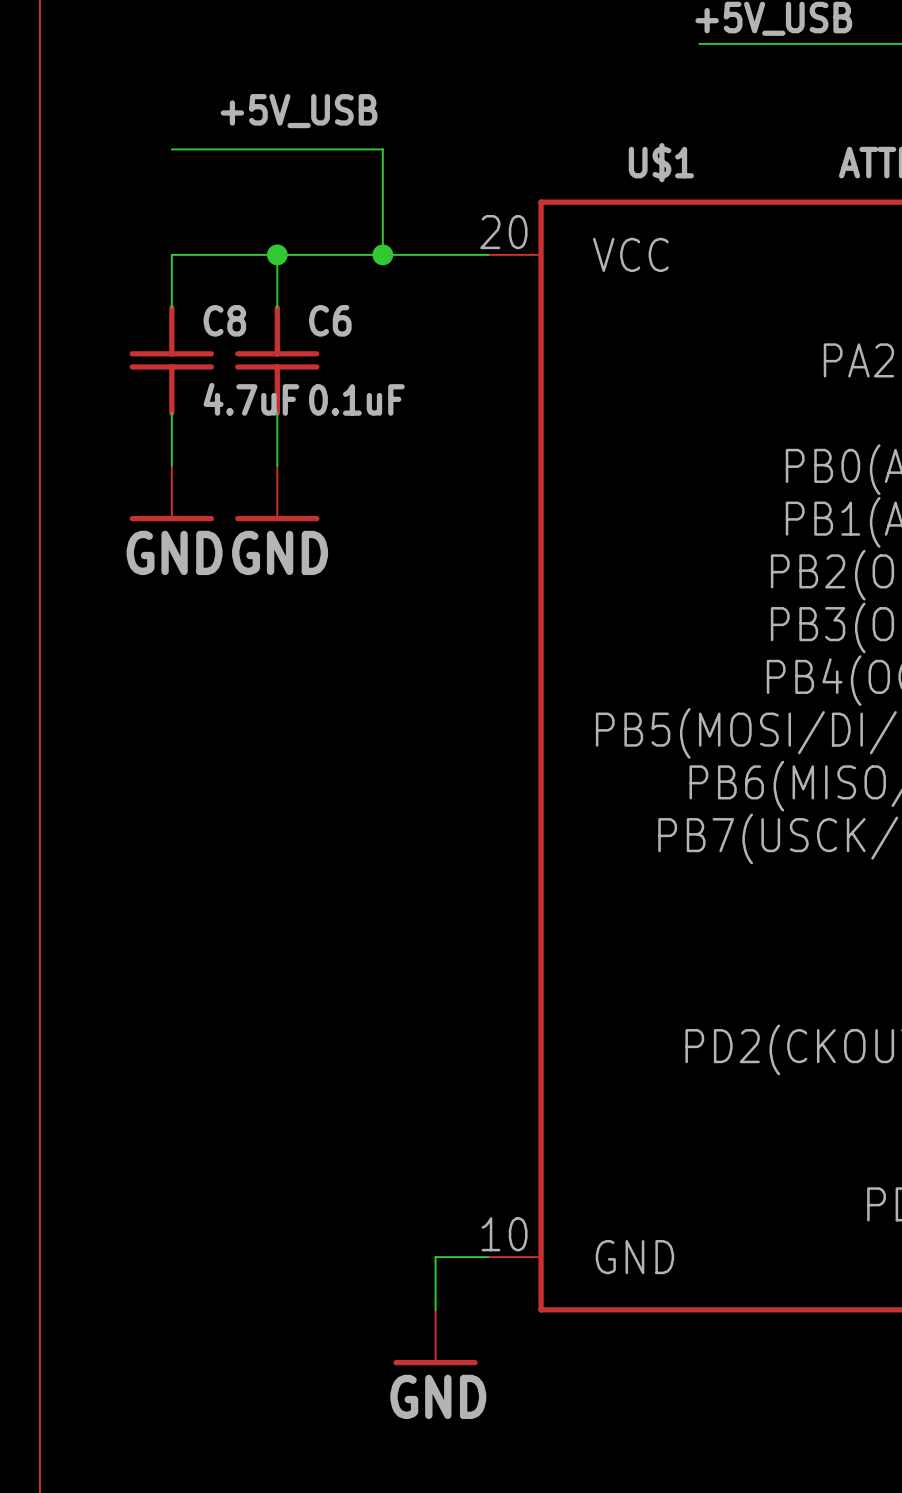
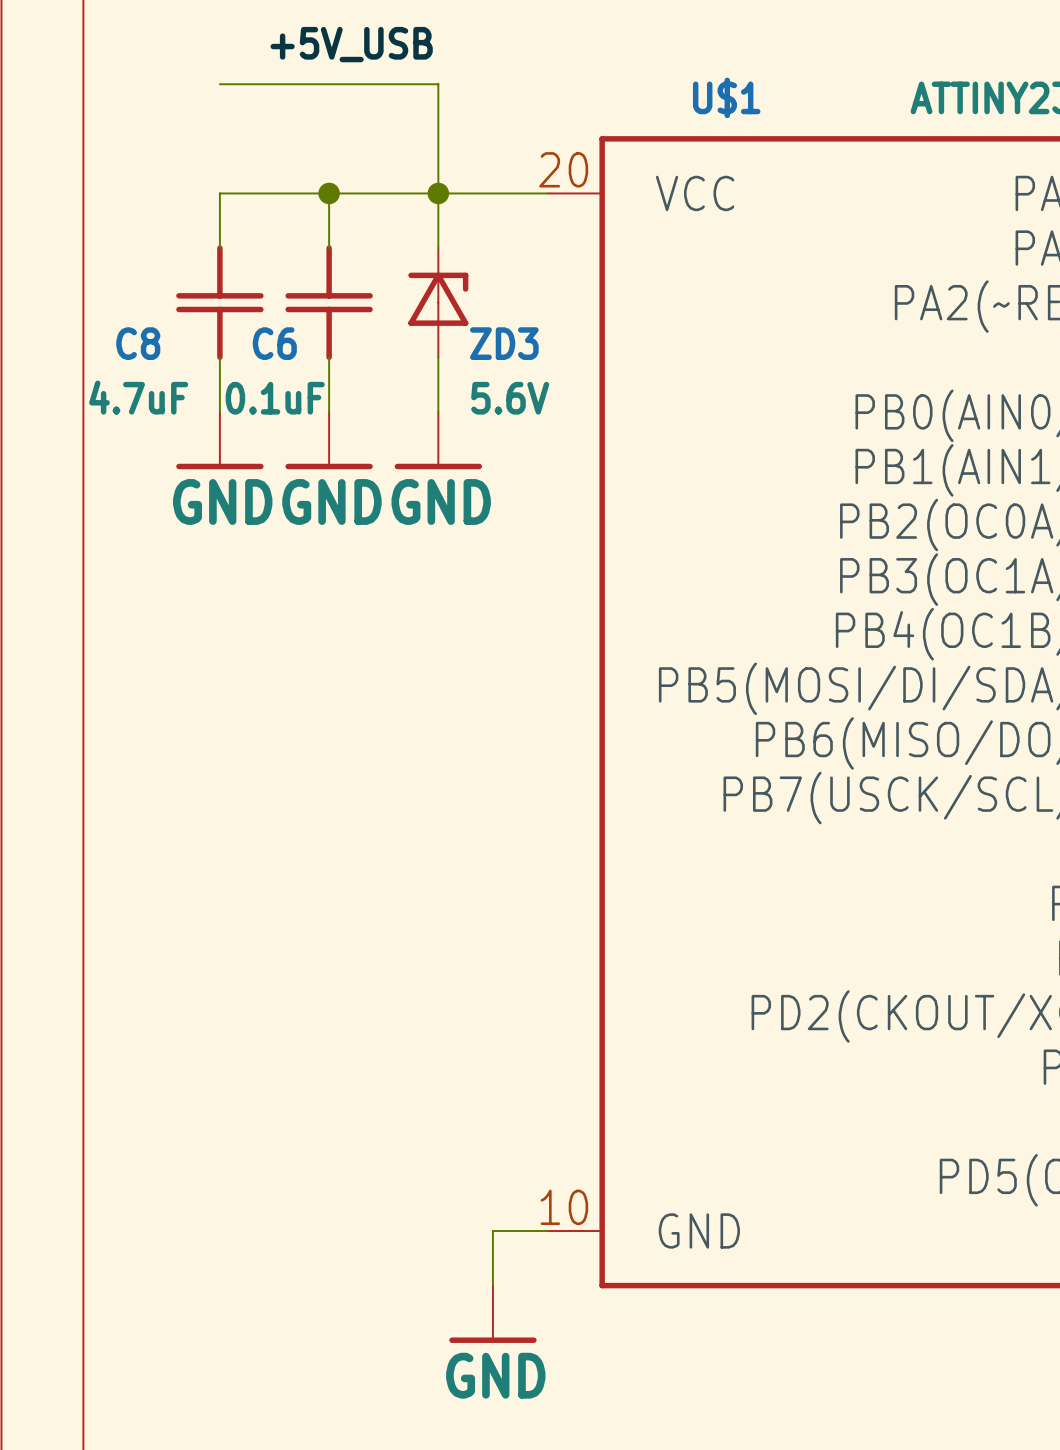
wire: none -> (438, 193) (438, 248)
C8 name position: C8 (224, 320) -> C8 (138, 343)
C6 name position: C6 (330, 320) -> C6 (274, 343)
ZD3: none -> 5.6V (438, 302)
C8 value position: 4.7uF (251, 399) -> 4.7uF (138, 397)
C6 value position: 0.1uF (356, 399) -> 0.1uF (275, 398)
wire: none -> (438, 357) (438, 411)
power symbol: none -> GND (438, 440)

